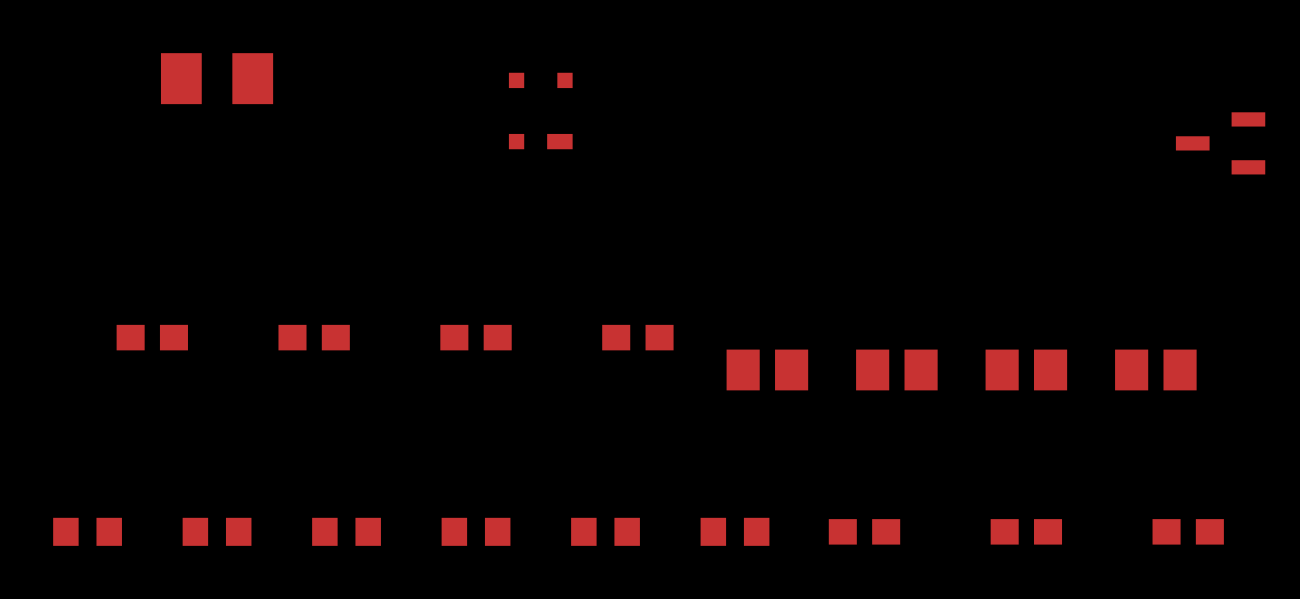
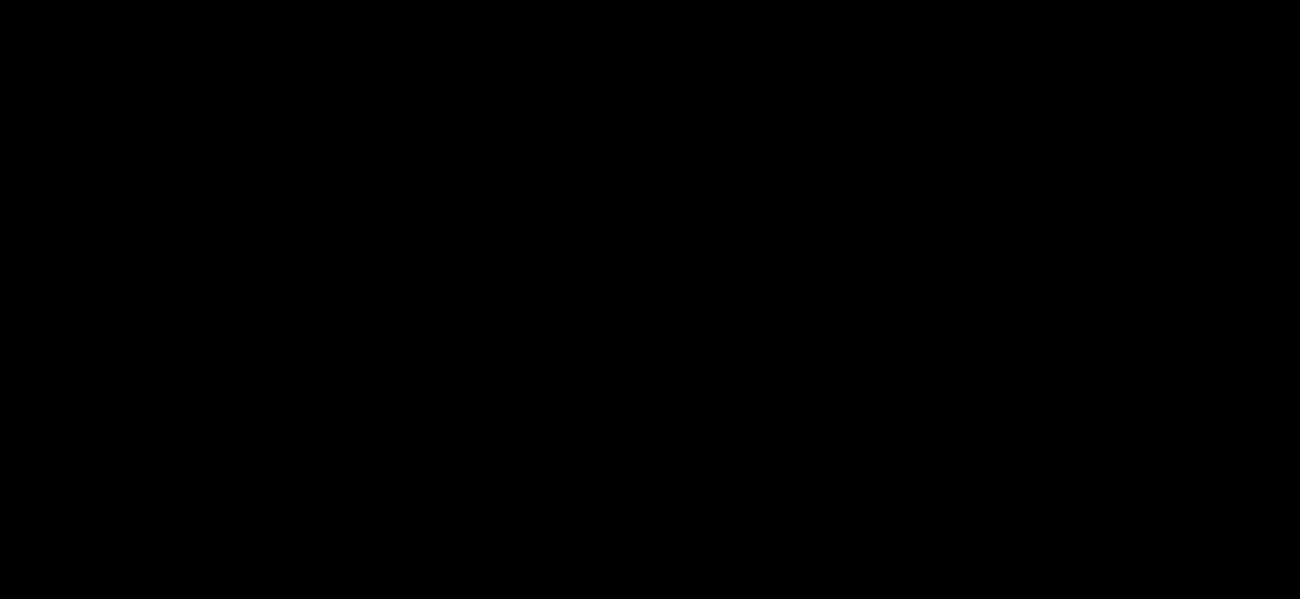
part: (217, 78) -> none
part: (540, 111) -> none
part: (1220, 143) -> none
part: (152, 337) -> none
part: (314, 337) -> none
part: (476, 337) -> none
part: (637, 337) -> none
part: (767, 369) -> none
part: (896, 369) -> none
part: (1026, 369) -> none
part: (1155, 369) -> none
part: (87, 531) -> none
part: (217, 531) -> none
part: (346, 531) -> none
part: (476, 531) -> none
part: (605, 531) -> none
part: (735, 531) -> none
part: (864, 531) -> none
part: (1026, 531) -> none
part: (1188, 531) -> none

